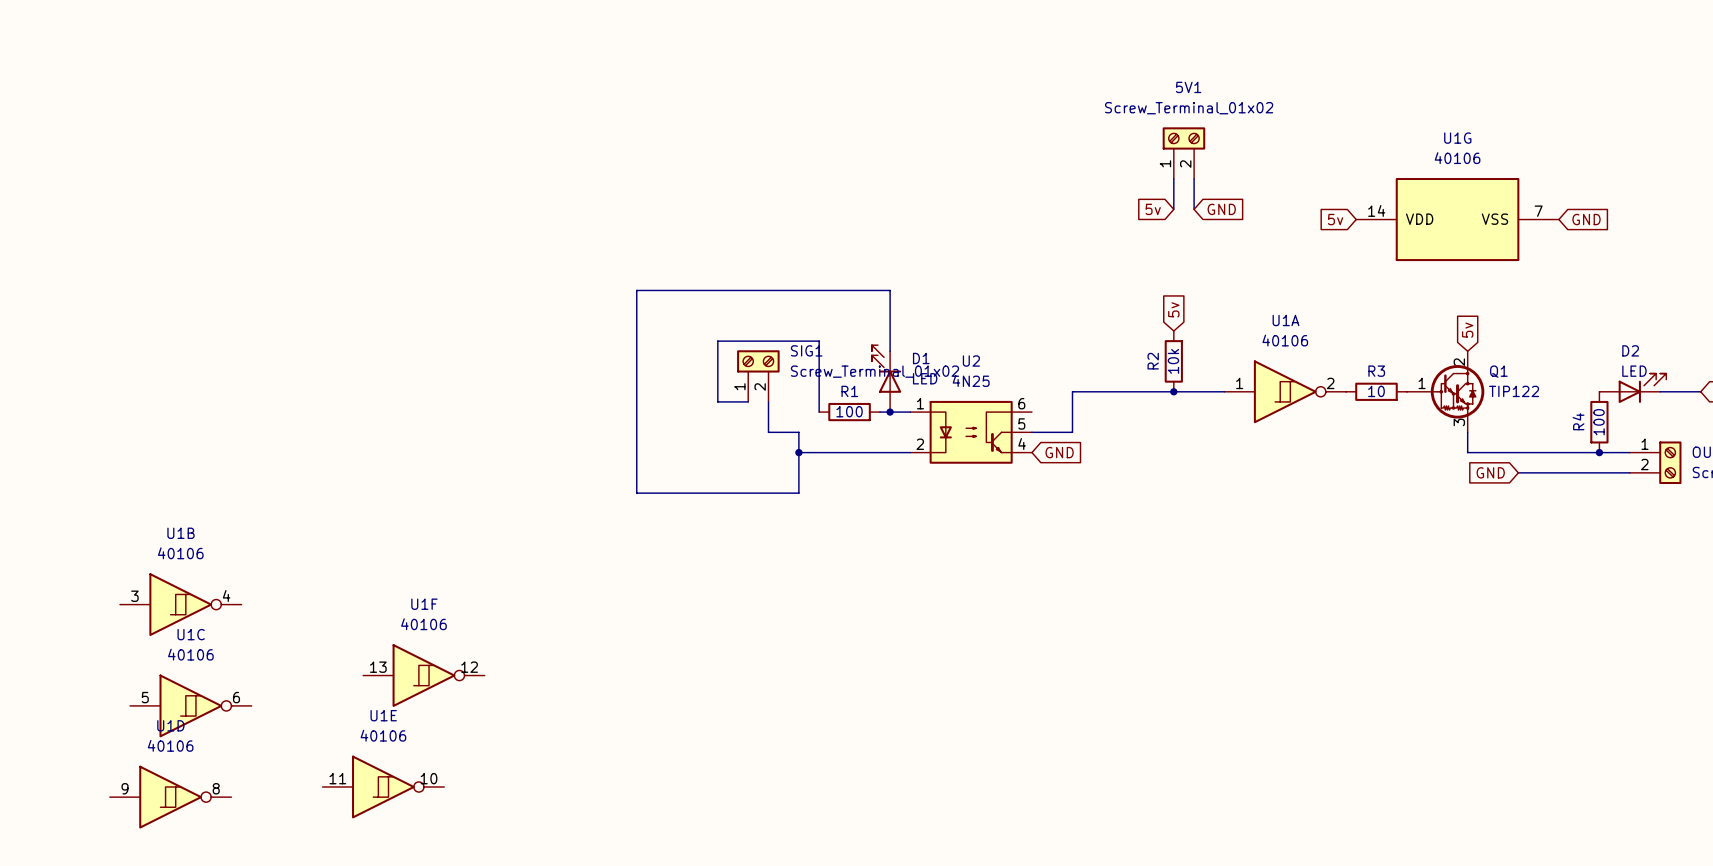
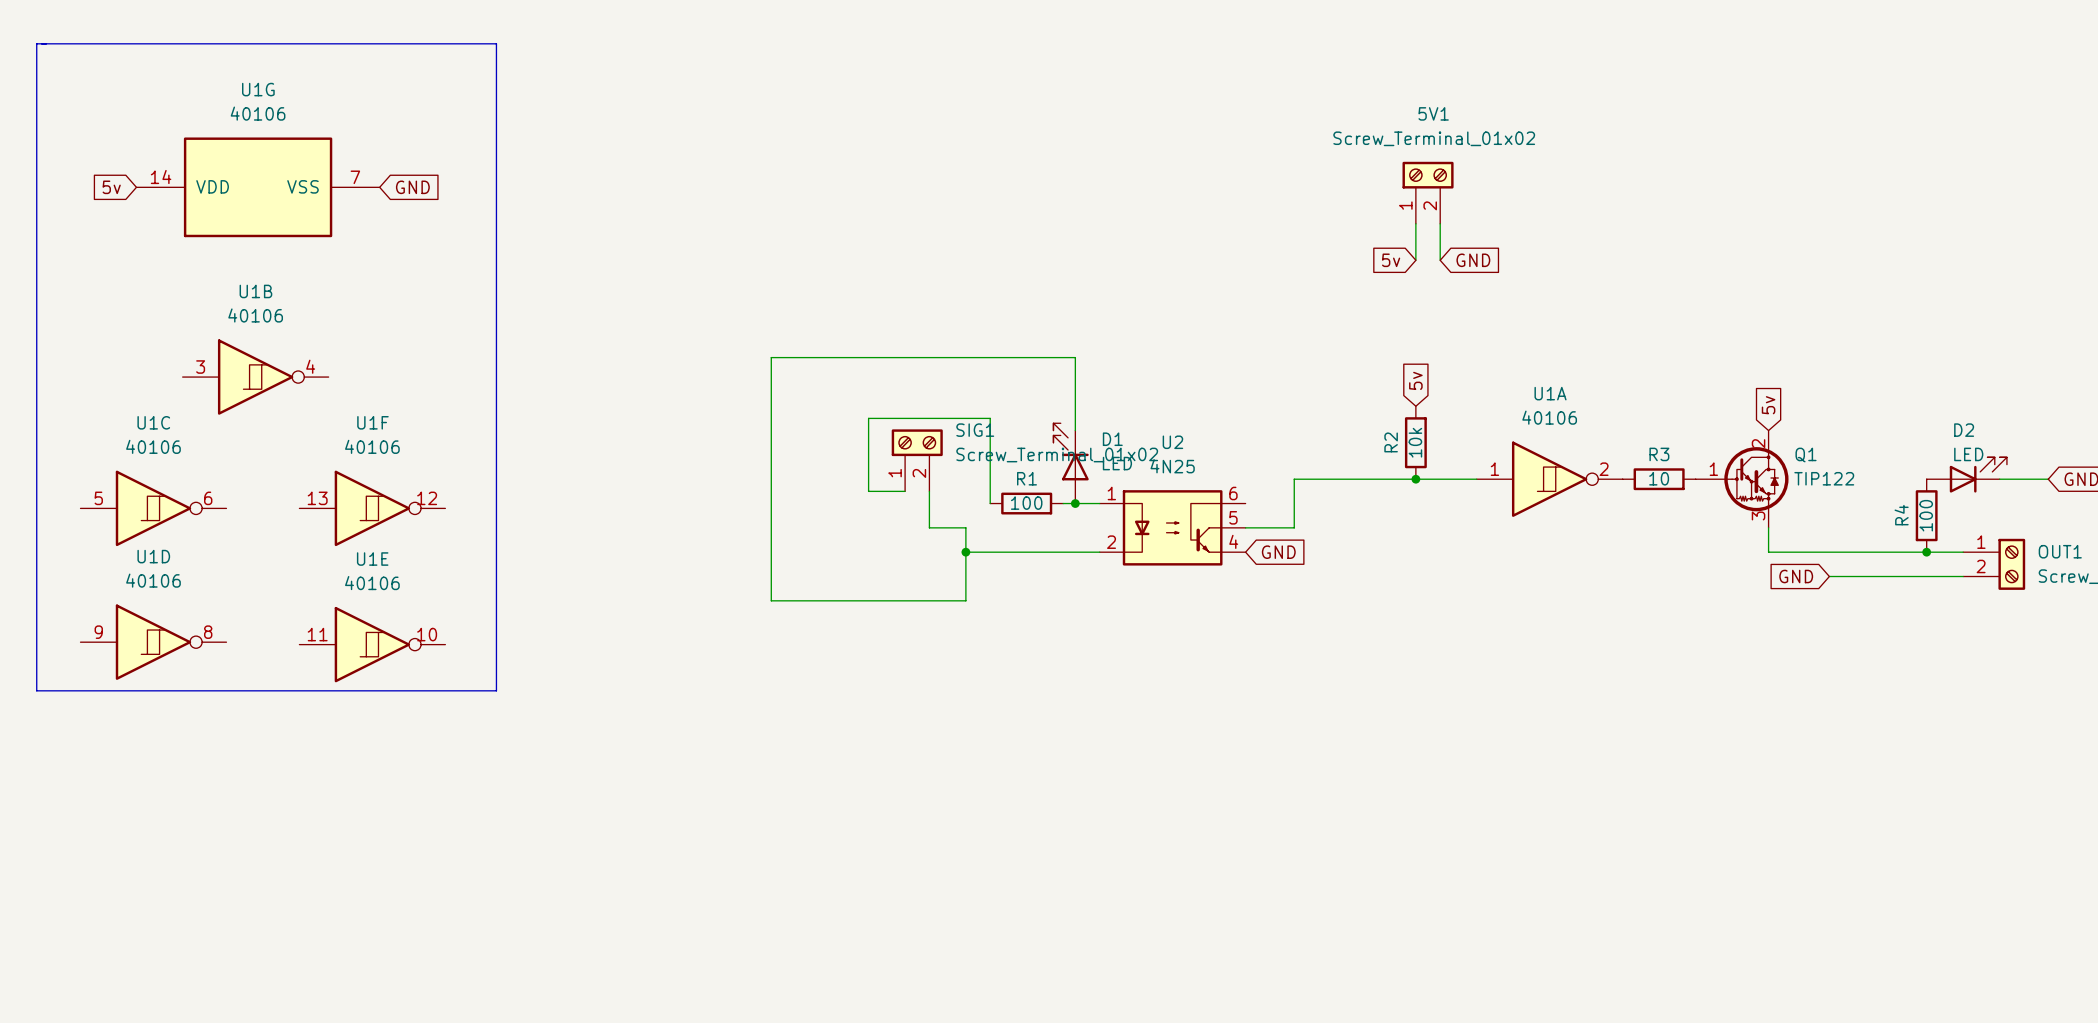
line: none -> (36, 43) (36, 690) (496, 690) (496, 43) (36, 43)
global label: none -> 5v (111, 187)
global label: none -> GND (412, 187)
global label: 5v (1335, 219) -> none
U1G position: (1457, 219) -> (258, 187)
global label: GND (1586, 219) -> none
U1B position: (180, 604) -> (255, 377)
U1F position: (423, 675) -> (372, 508)
U1C position: (190, 705) -> (153, 508)
U1E position: (383, 786) -> (372, 644)
U1D position: (170, 797) -> (153, 642)

